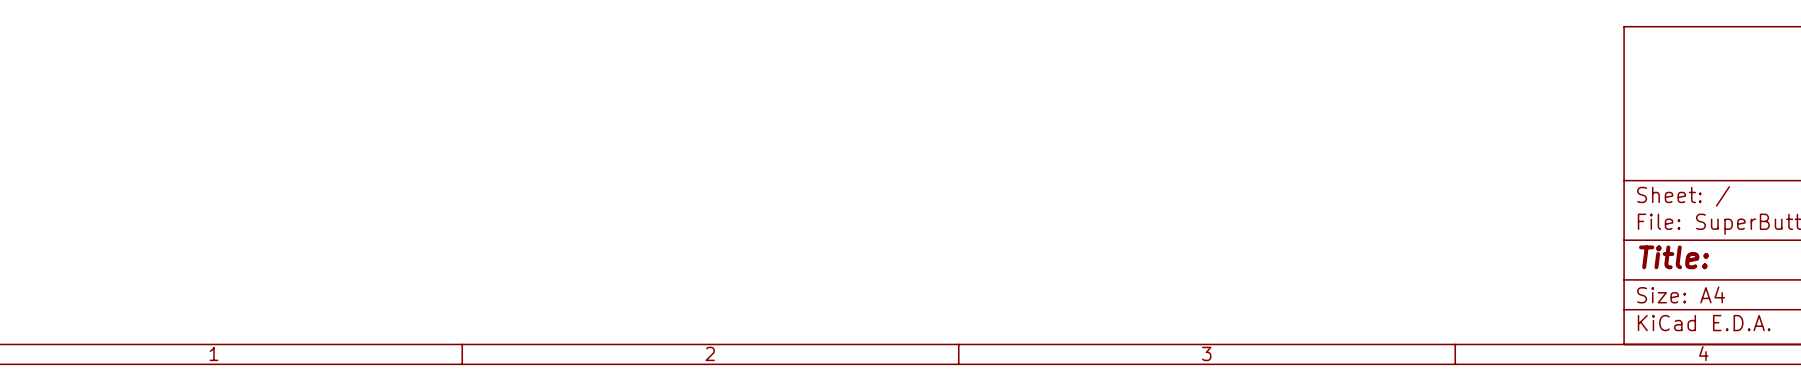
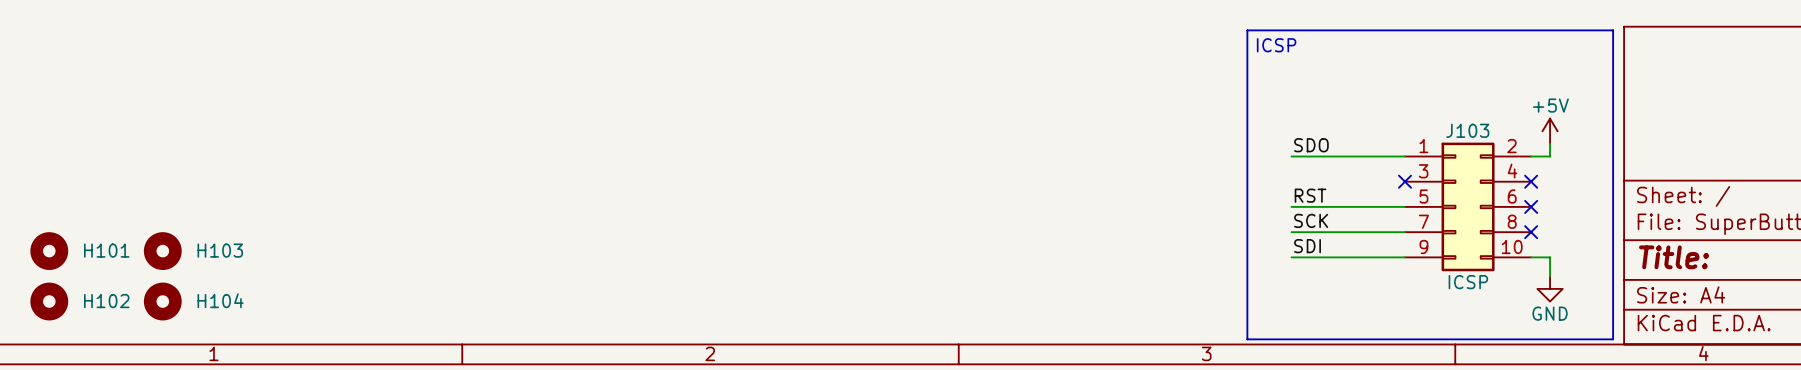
line: none -> (1247, 30) (1613, 30) (1613, 339) (1247, 339) (1247, 30)
text: none -> ICSP (1276, 45)
power symbol: none -> +5V (1550, 131)
wire: none -> (1550, 143) (1550, 156) (1531, 156)
label: none -> SDO (1311, 145)
wire: none -> (1291, 156) (1405, 156)
no-connect mark: none -> (1405, 181)
no-connect mark: none -> (1531, 181)
label: none -> RST (1310, 195)
wire: none -> (1291, 206) (1405, 206)
J103: none -> ICSP (1468, 206)
no-connect mark: none -> (1531, 206)
label: none -> SCK (1311, 220)
wire: none -> (1291, 232) (1405, 232)
no-connect mark: none -> (1531, 232)
label: none -> SDI (1307, 246)
H101: none -> (49, 251)
H103: none -> (162, 251)
wire: none -> (1291, 257) (1405, 257)
wire: none -> (1531, 257) (1550, 257) (1550, 276)
power symbol: none -> GND (1550, 288)
H102: none -> (49, 301)
H104: none -> (162, 301)

